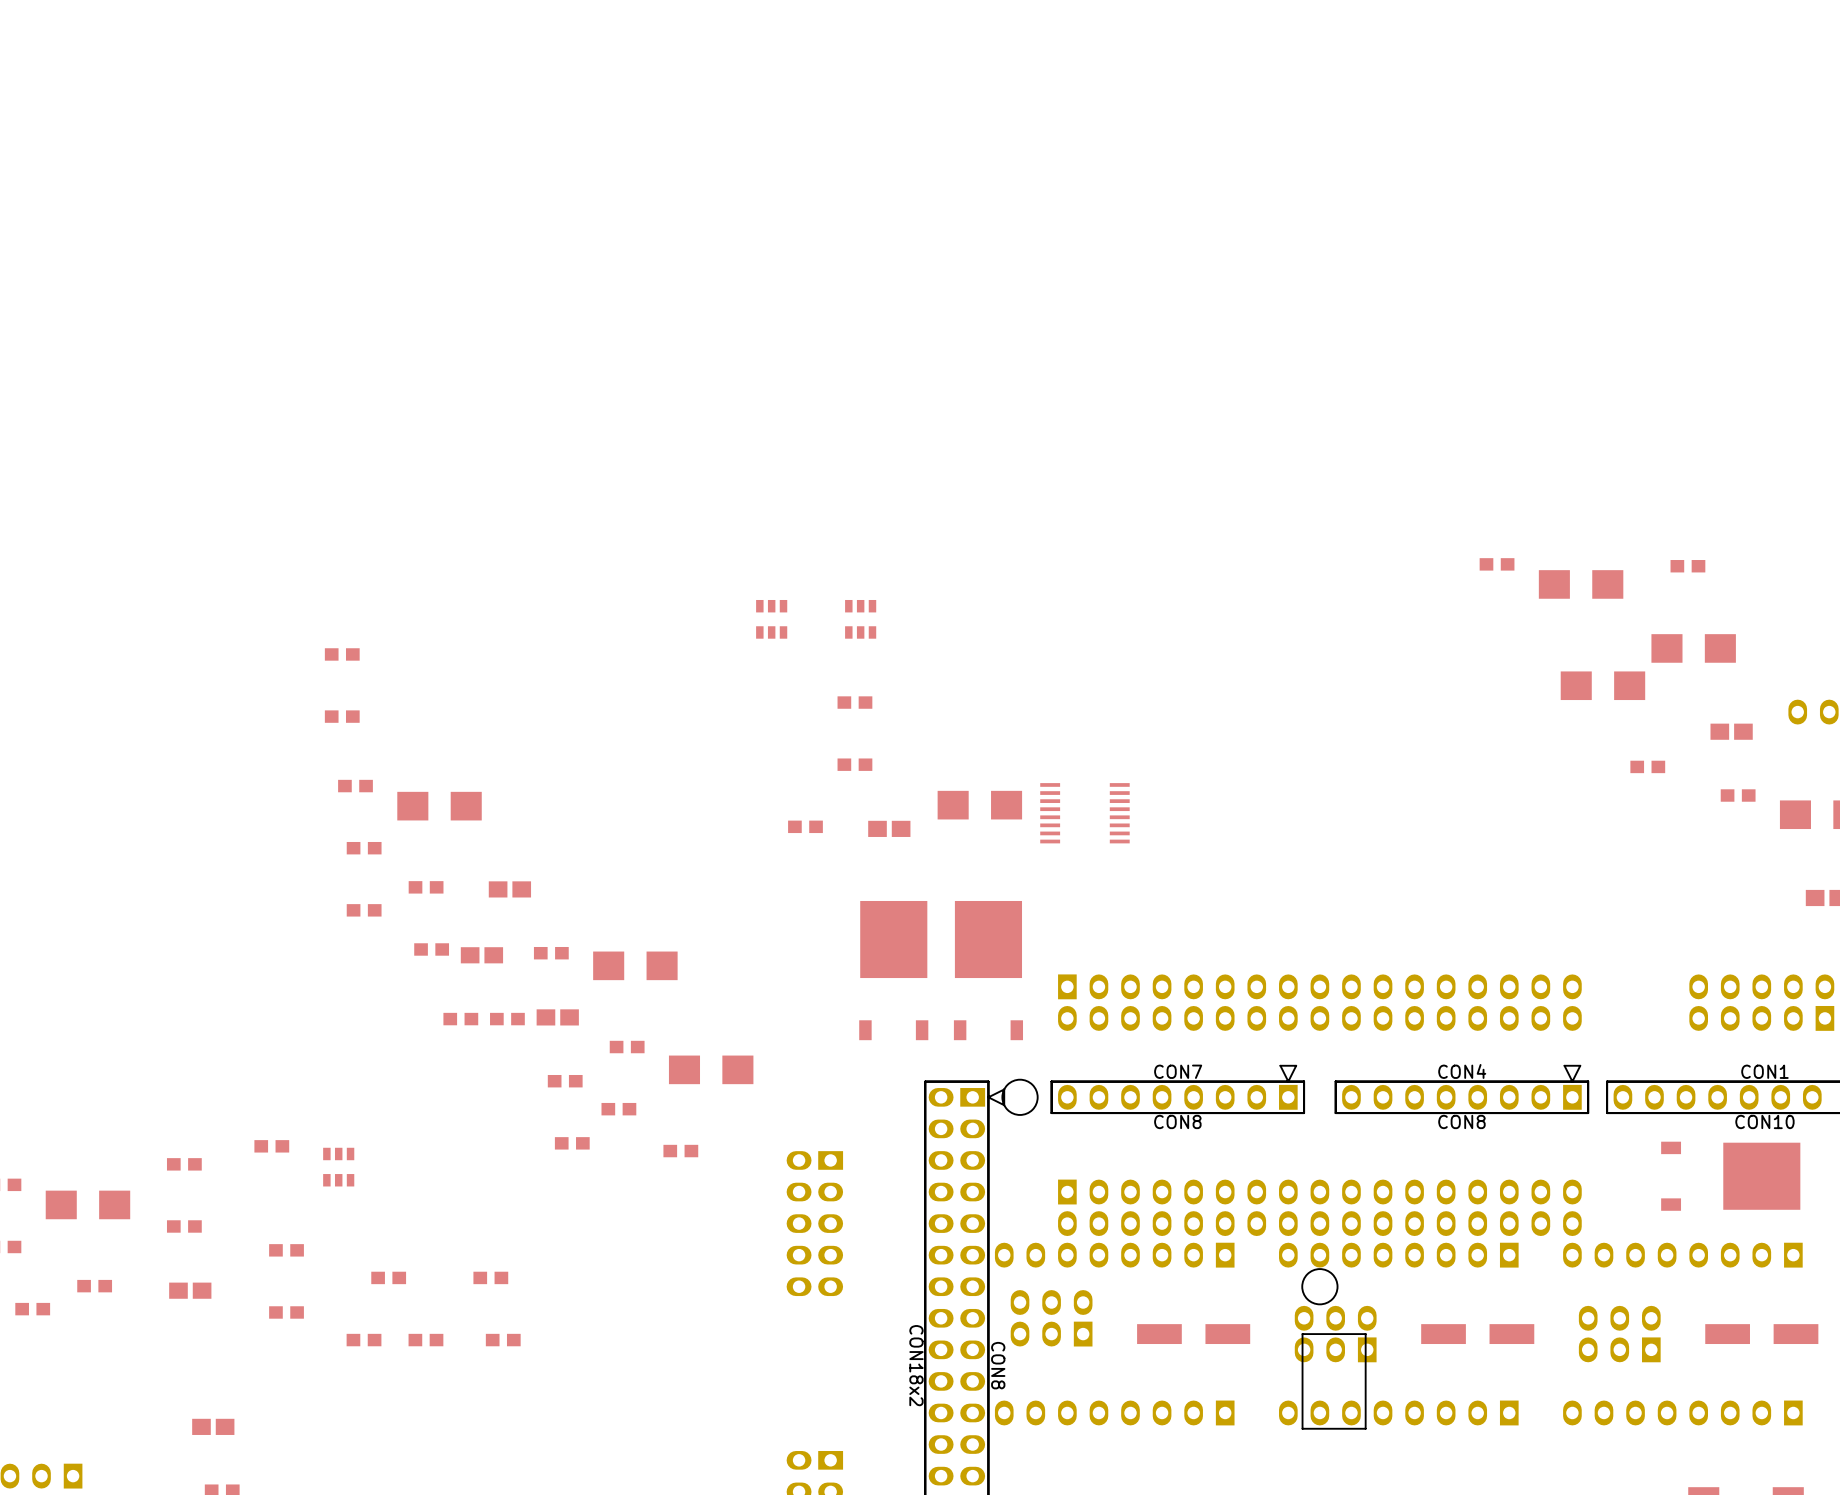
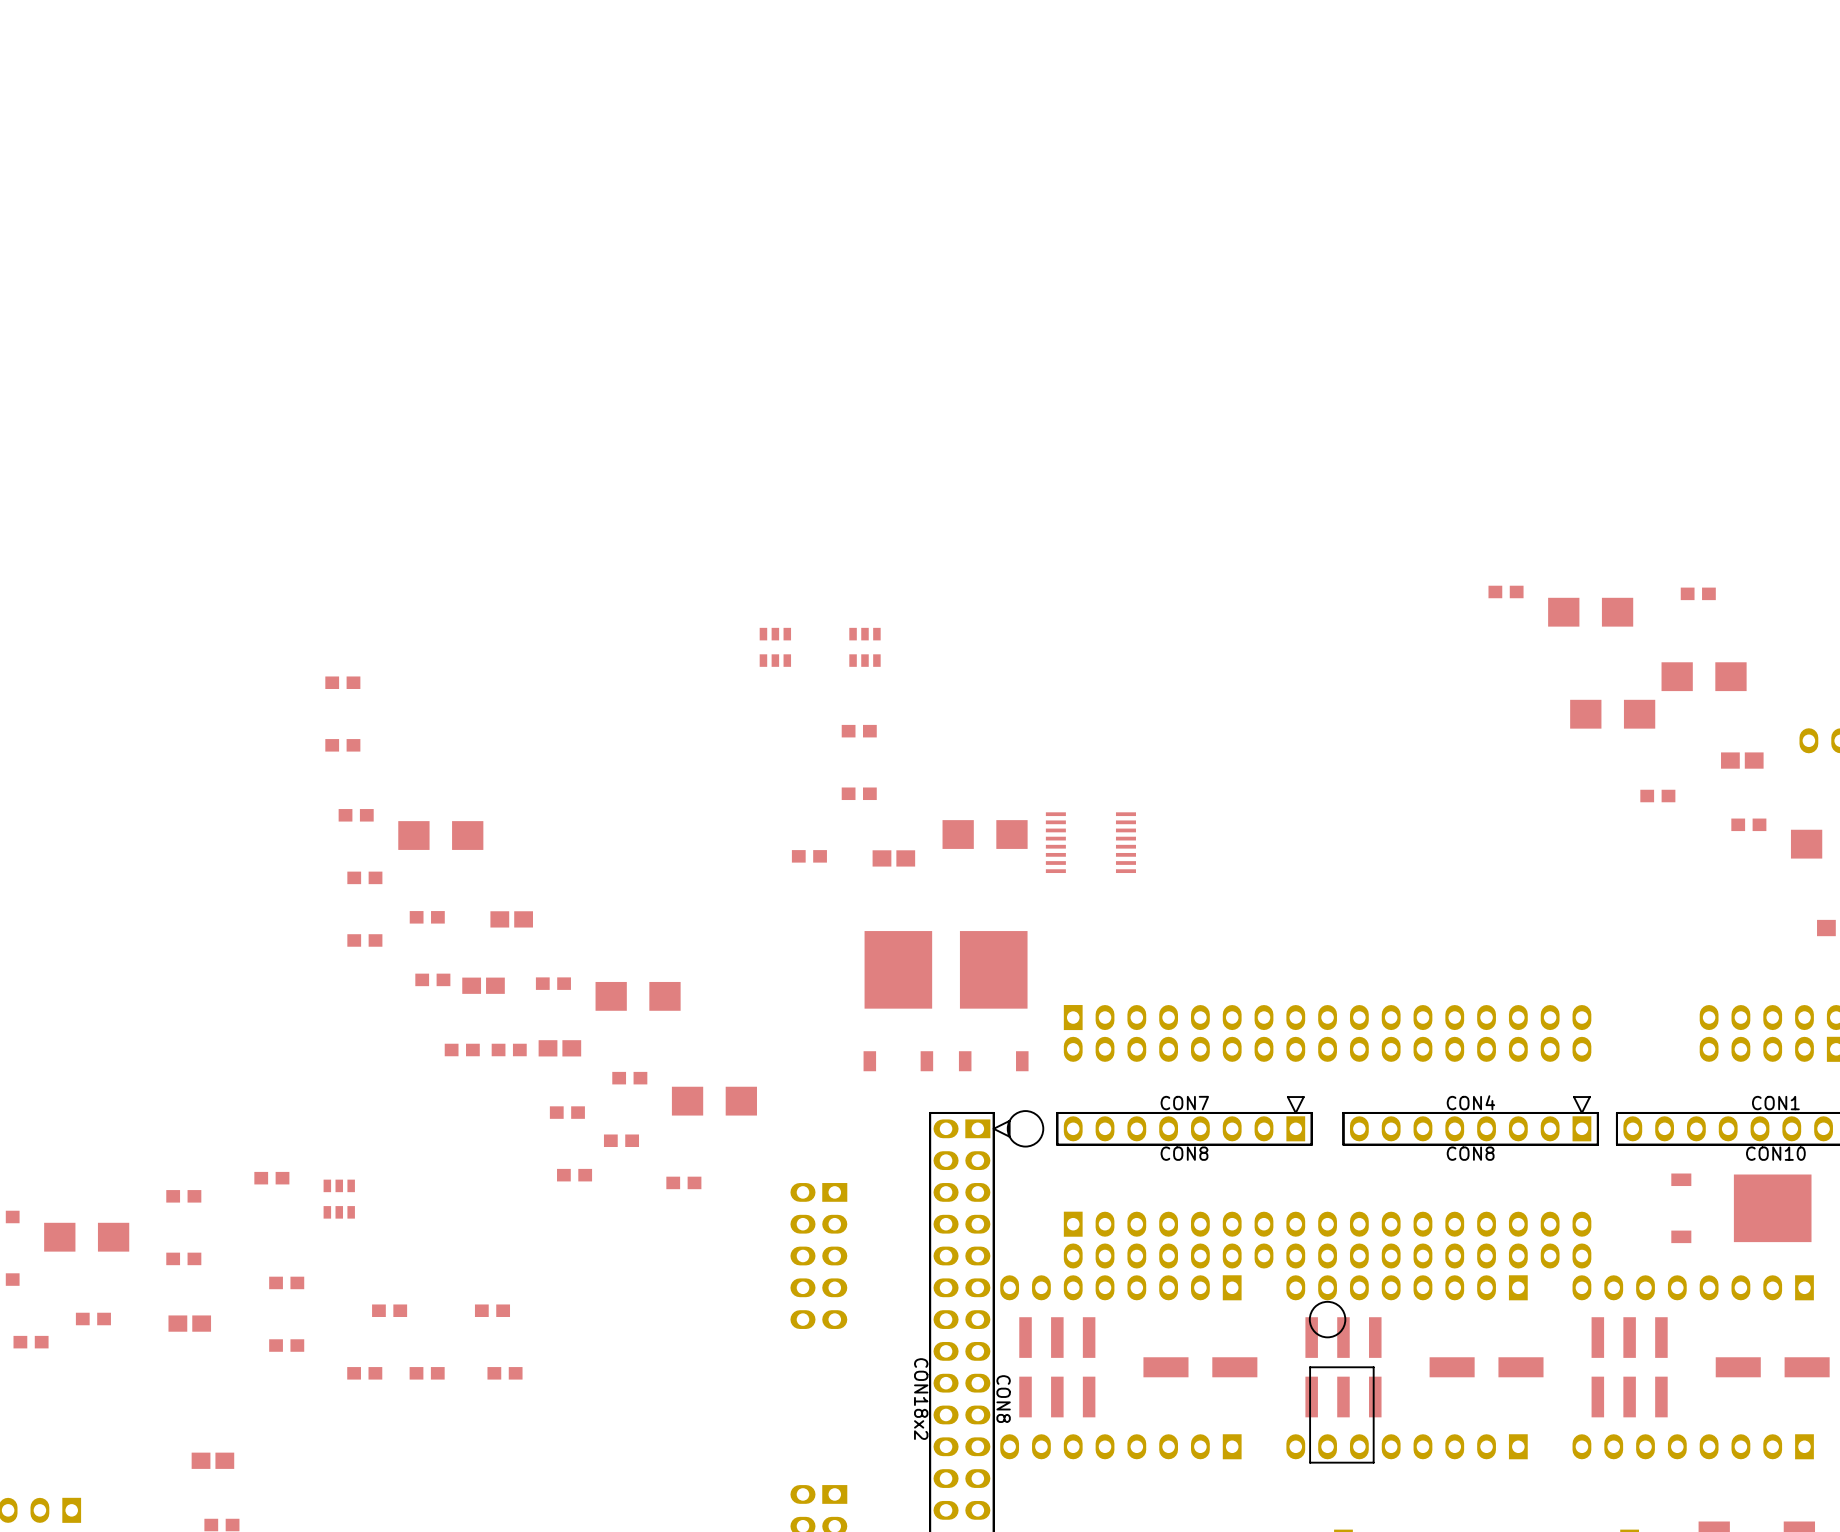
part footprint: [1294, 1305, 1377, 1363] -> [1305, 1317, 1382, 1418]
part footprint: [1578, 1305, 1661, 1363] -> [1591, 1317, 1668, 1418]
part: (1051, 1318) -> none
part: none -> (1057, 1367)

